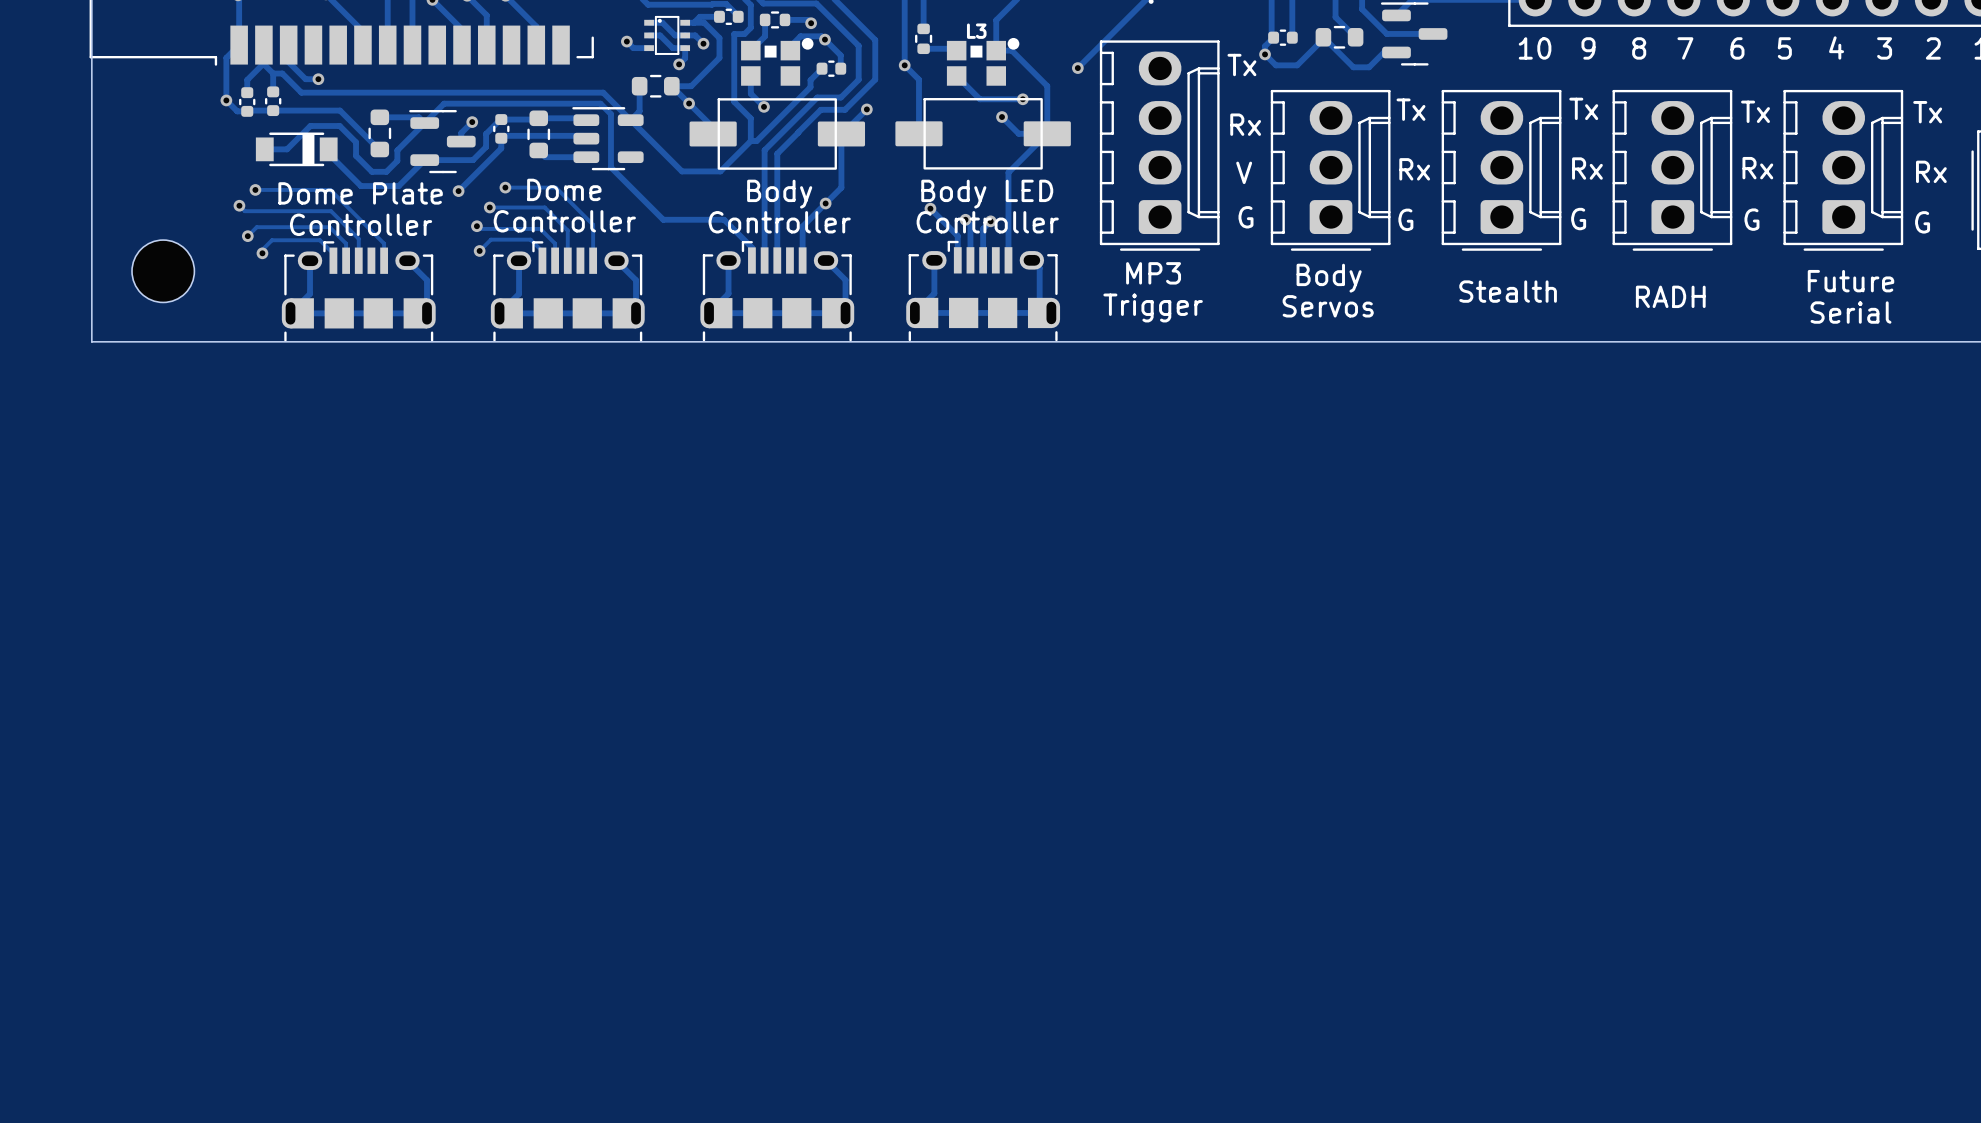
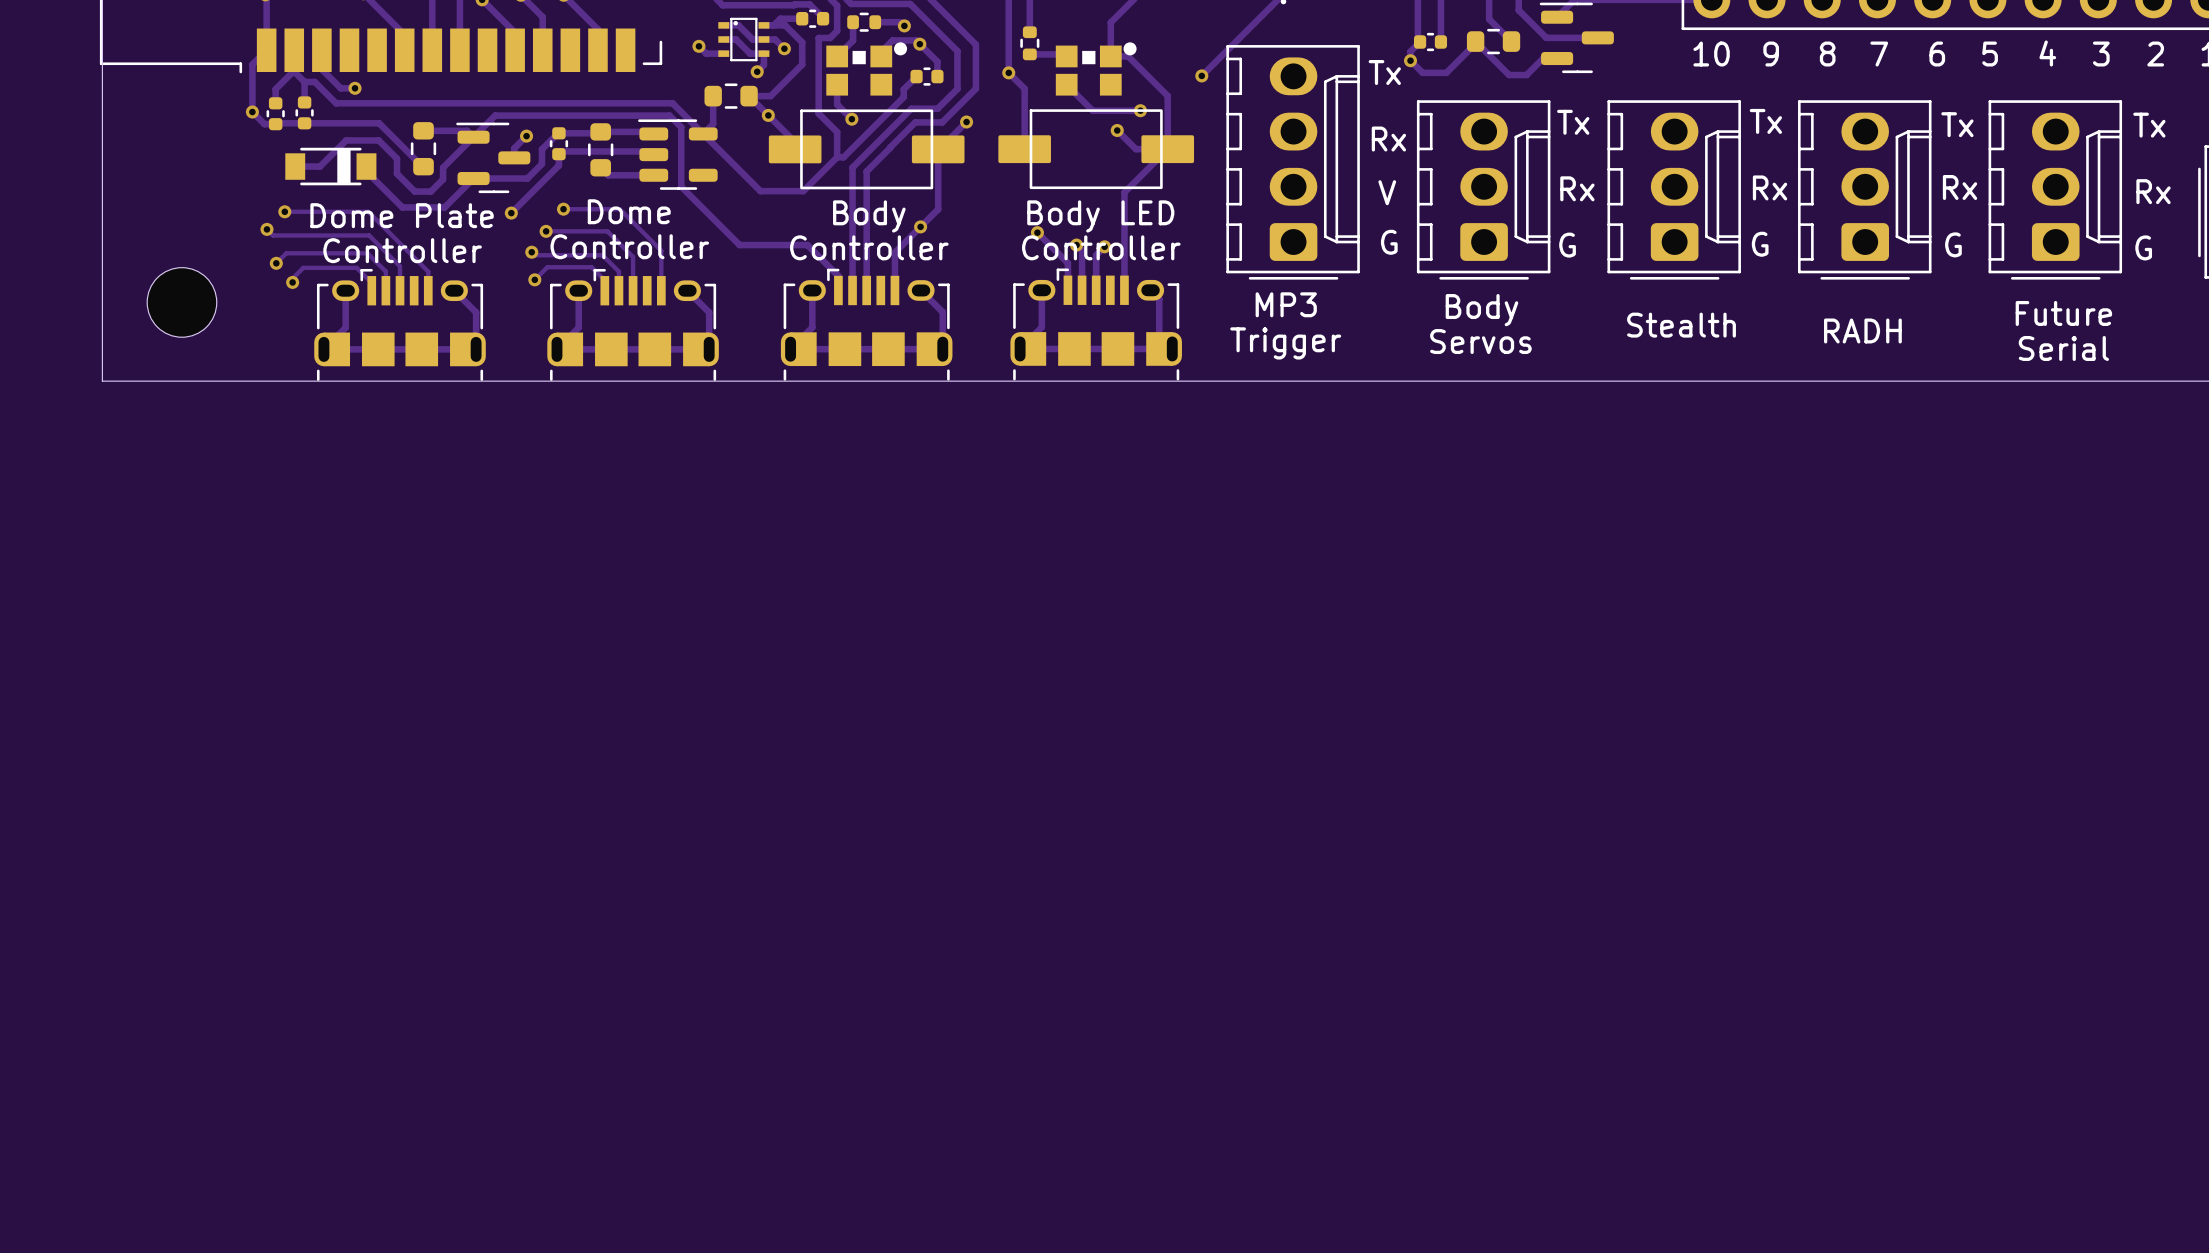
L3 name: L3 (976, 31) -> none

